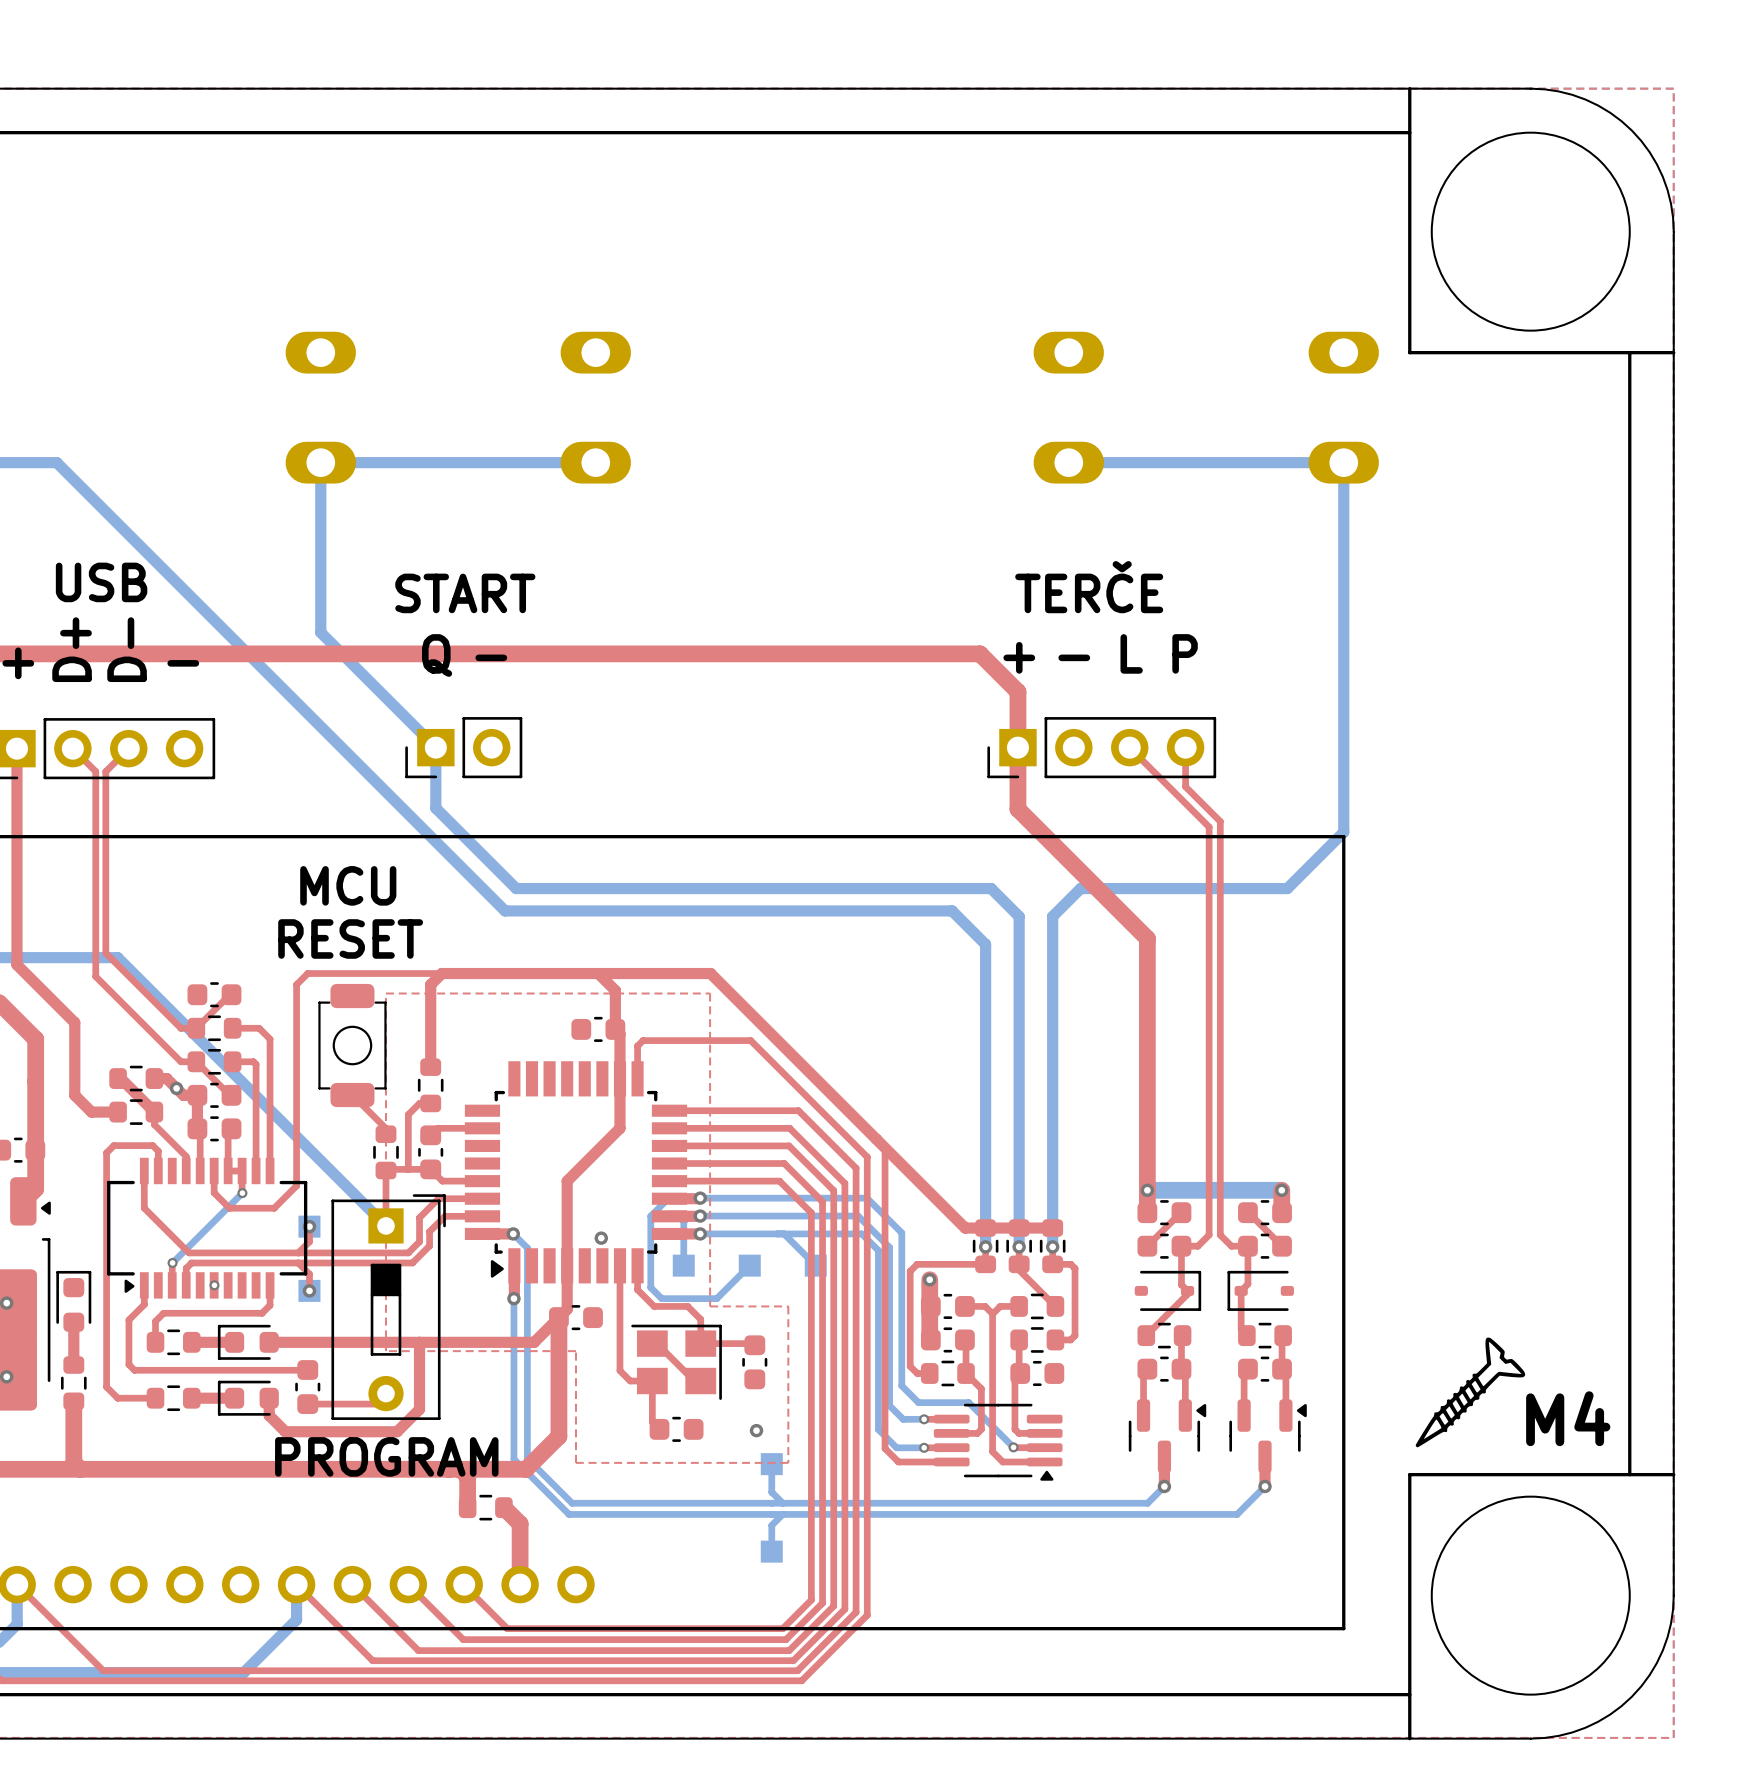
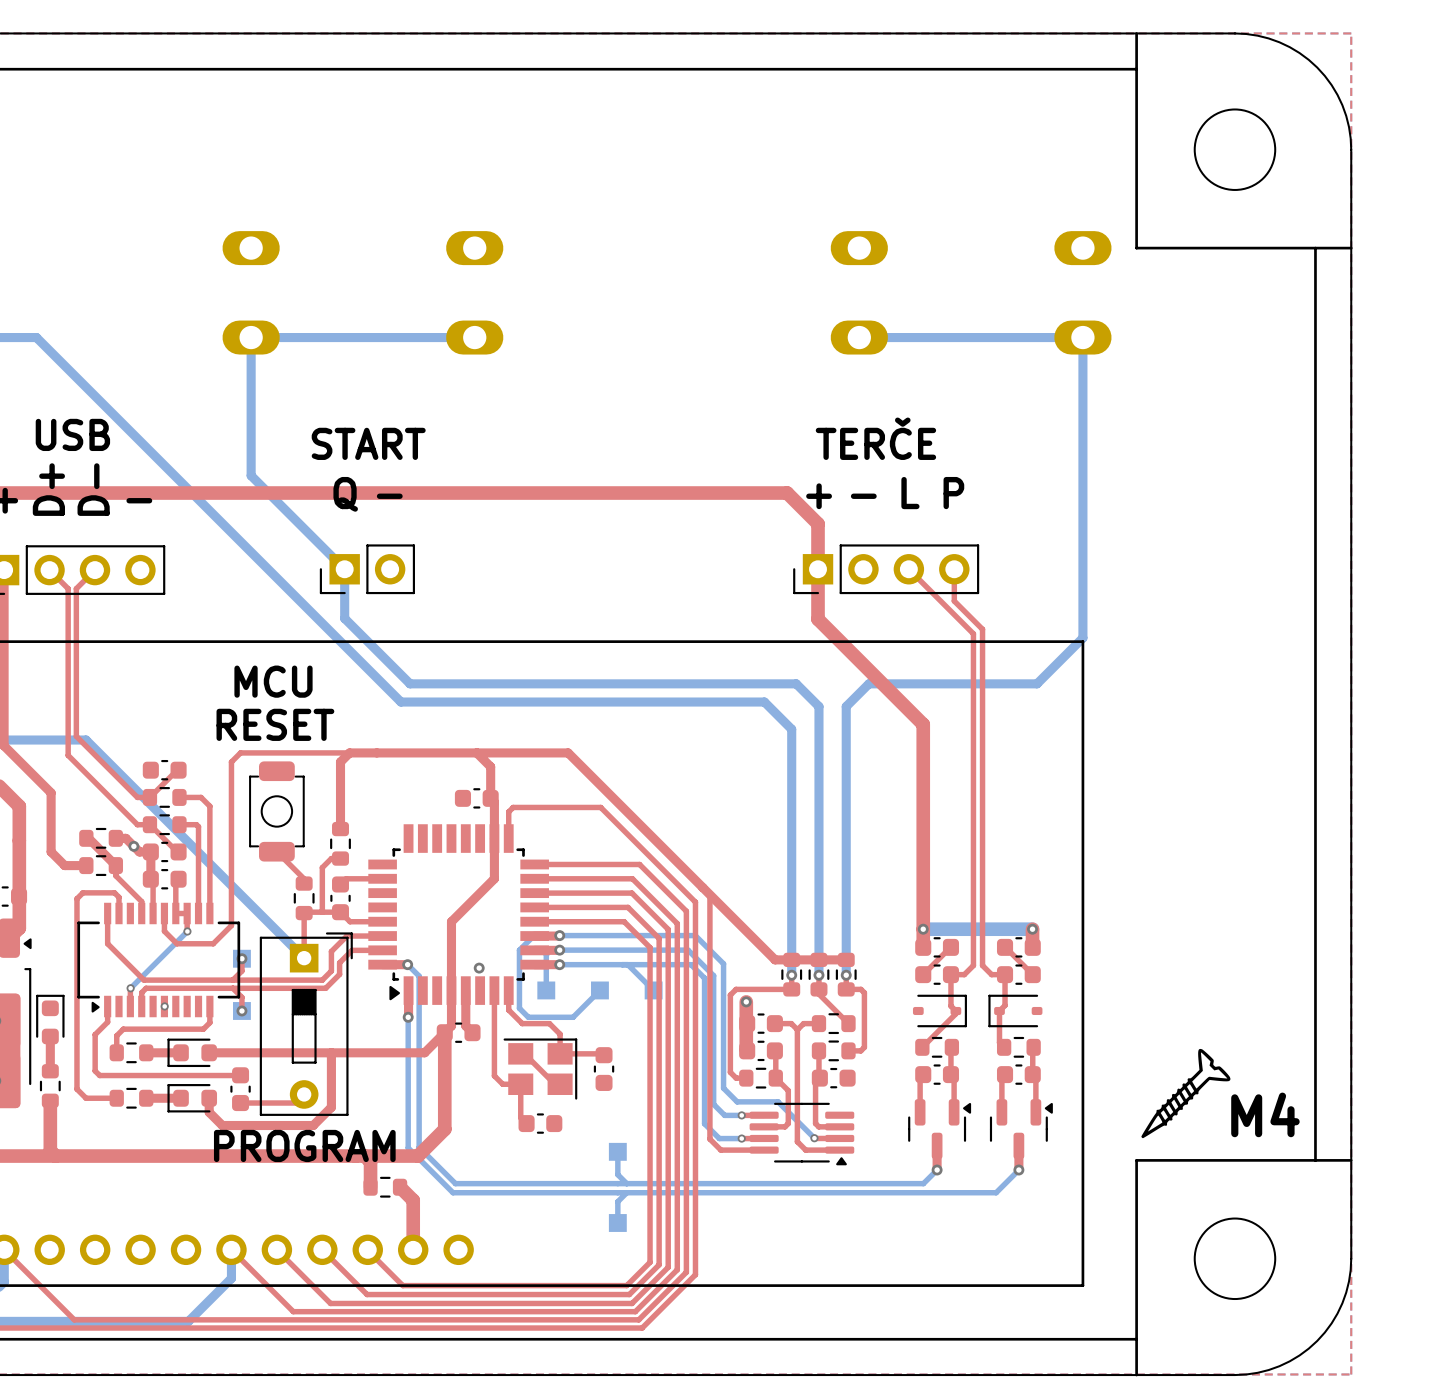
round board edge size: [1431, 132, 1631, 332] -> [1194, 109, 1276, 191]
top zone outline: (385, 993) (385, 1351) (575, 1351) (575, 1462) (788, 1462) (788, 1306) (710, 1306) (710, 993) (385, 993) -> none
top track: none -> (465, 990) (465, 1025) (472, 1032)
via: (756, 1430) -> none
round board edge size: [1431, 1496, 1631, 1696] -> [1194, 1218, 1276, 1300]

